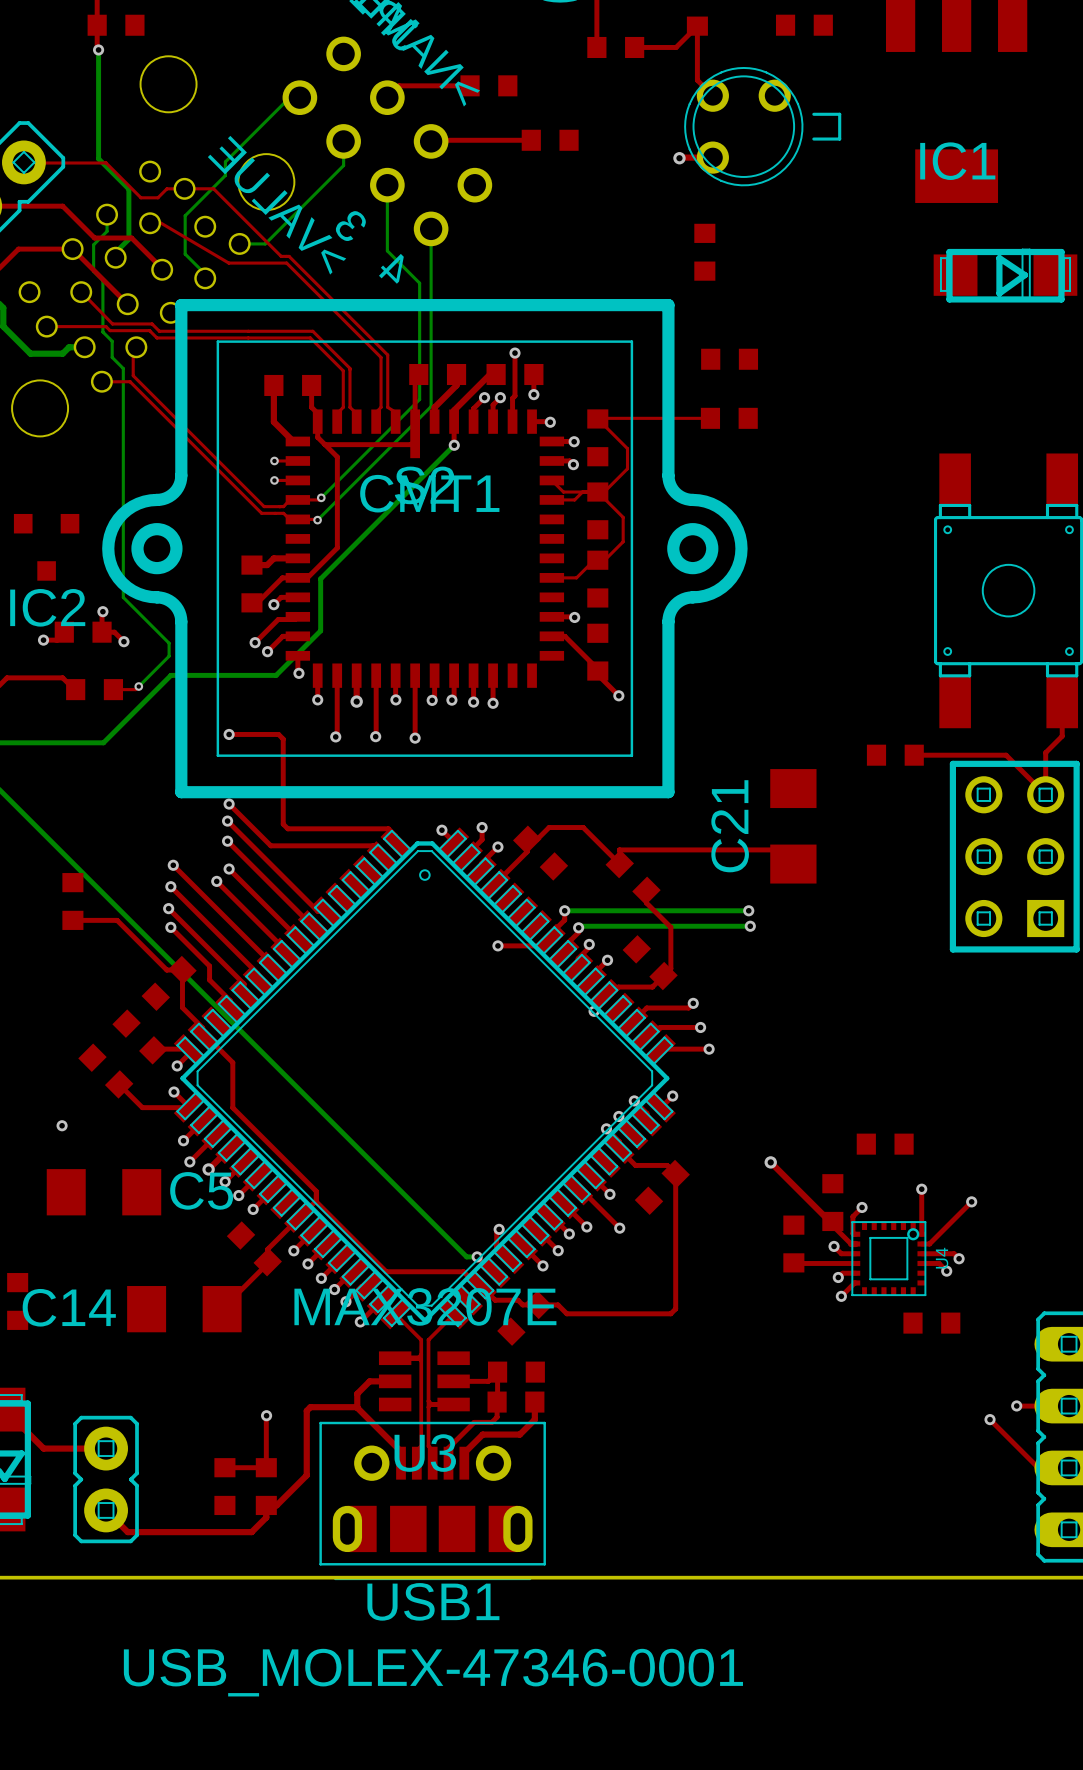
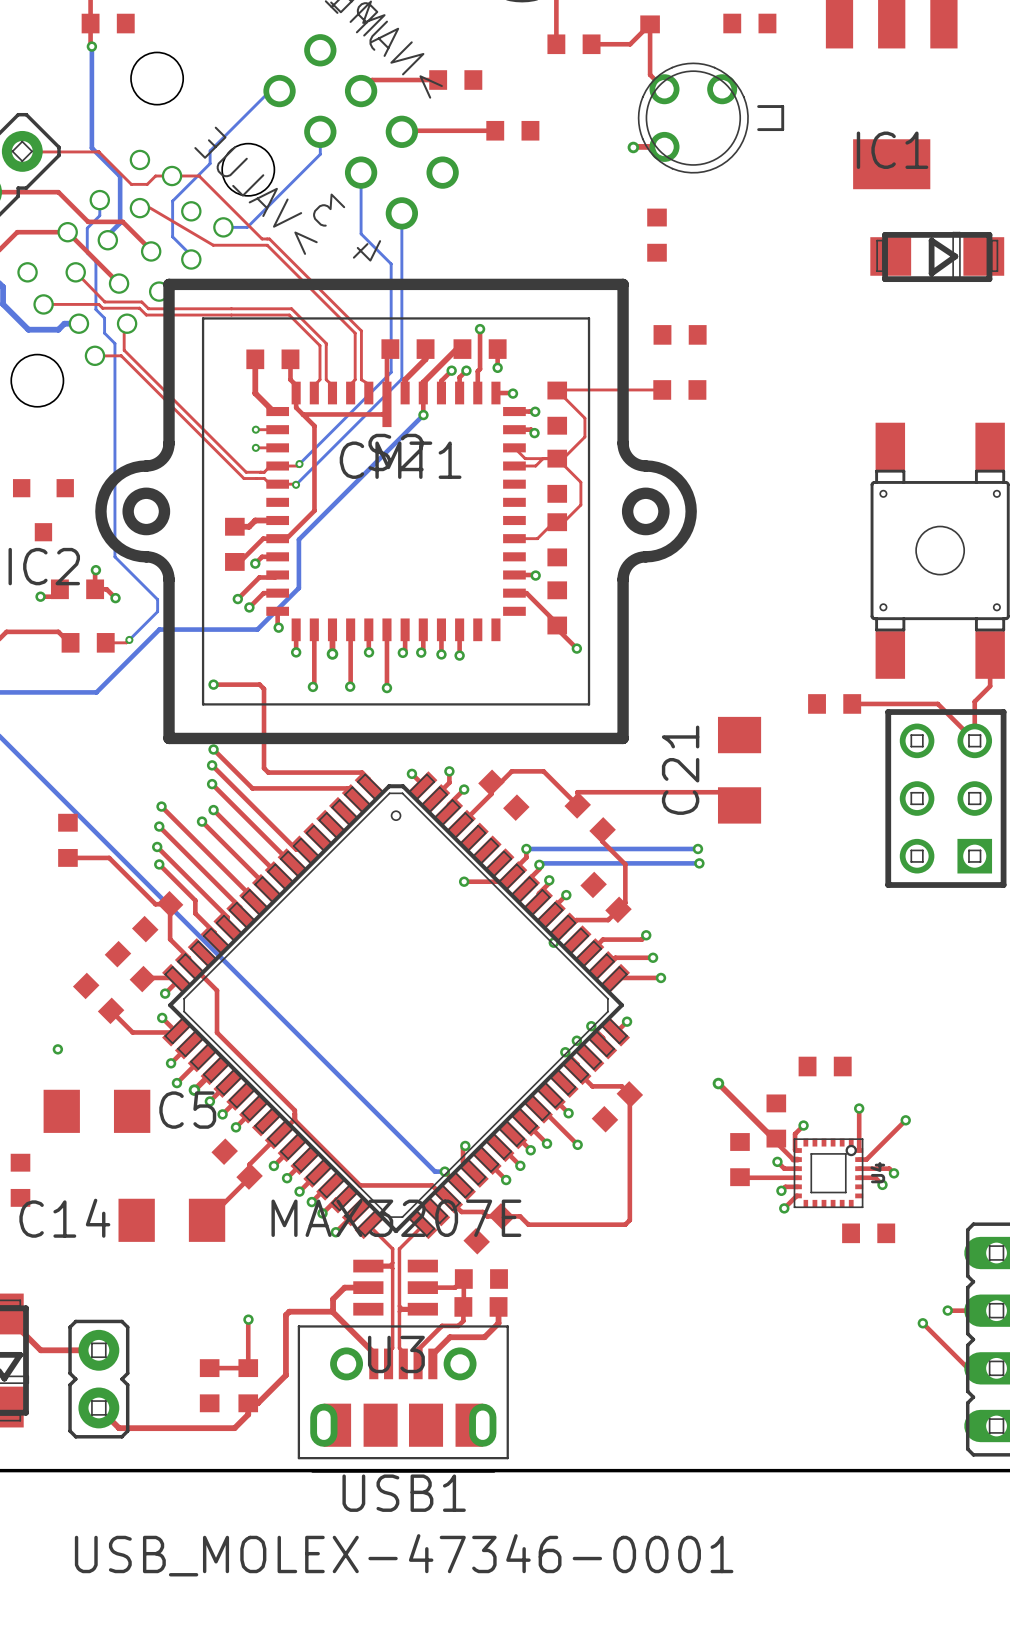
part: none -> (20, 1180)
part: (17, 1301) -> none

